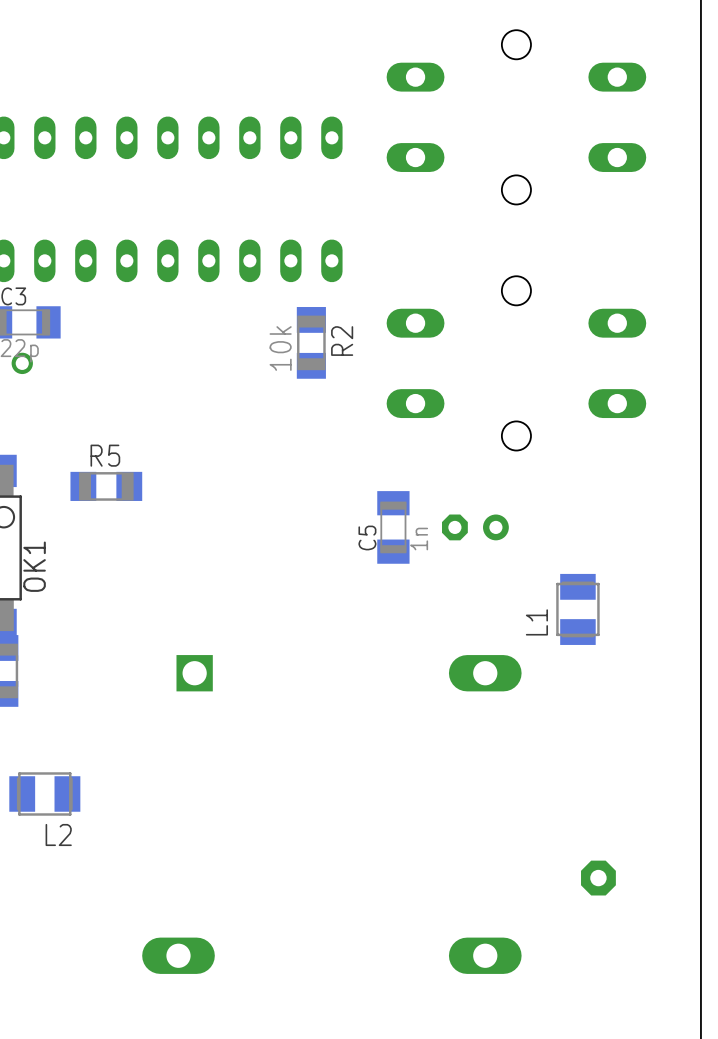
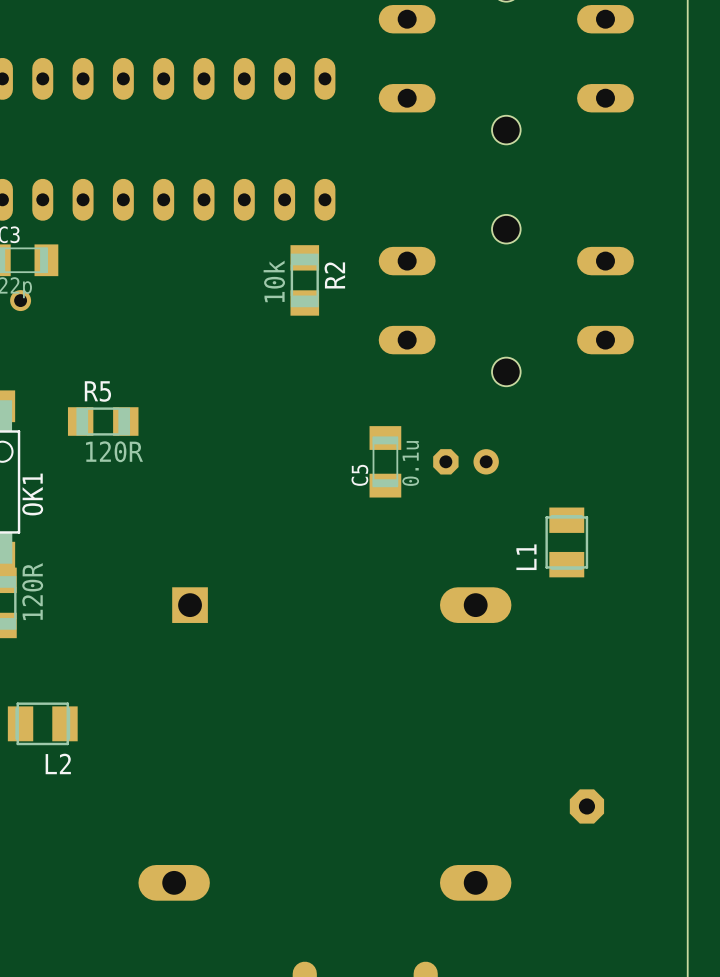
R5 value: none -> 120R (114, 451)
C5 value: 1n (419, 539) -> 0.1u (410, 463)
part value: none -> 120R (32, 591)

